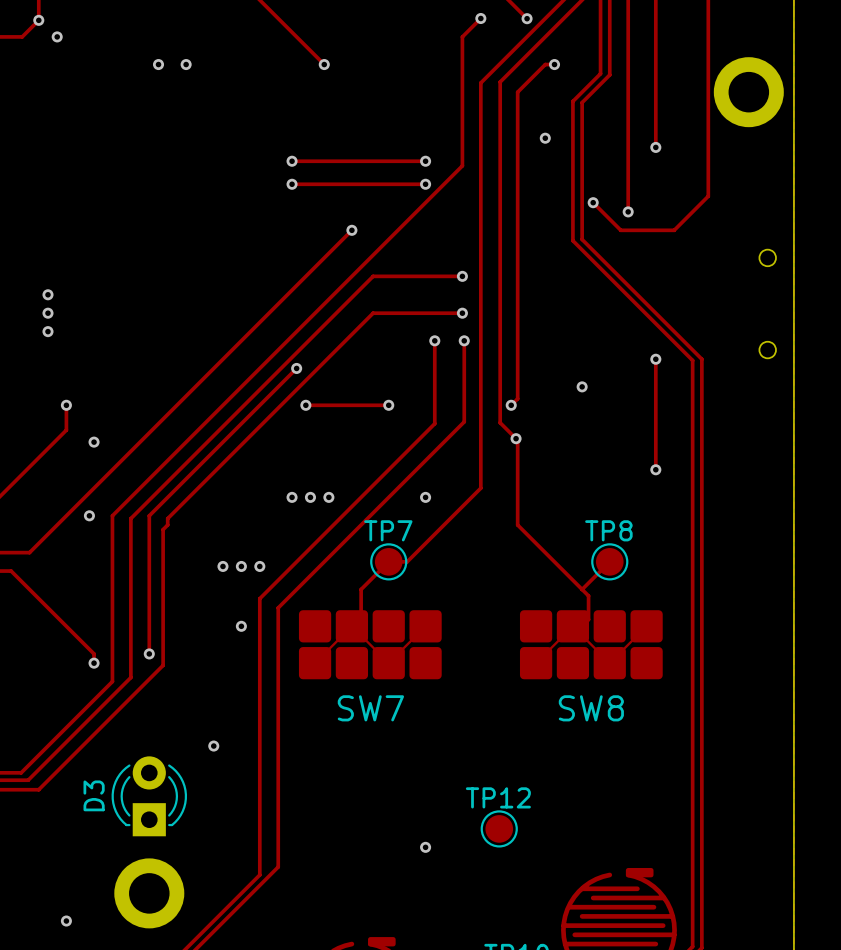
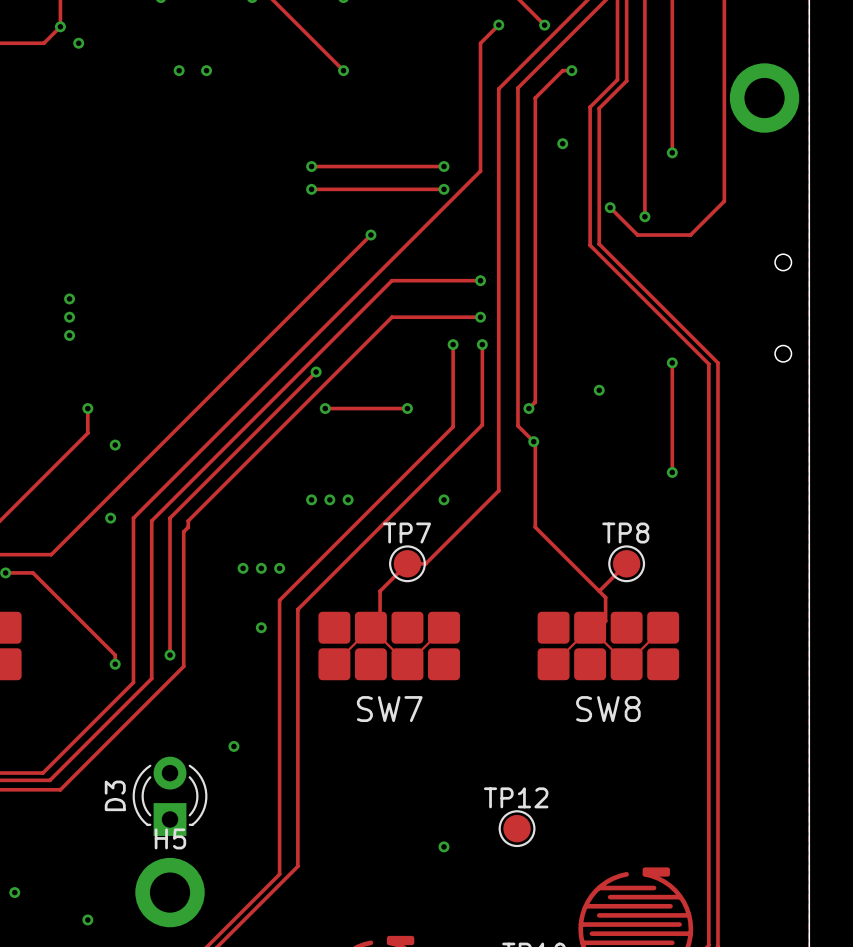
H5 name: none -> H5 (170, 838)

